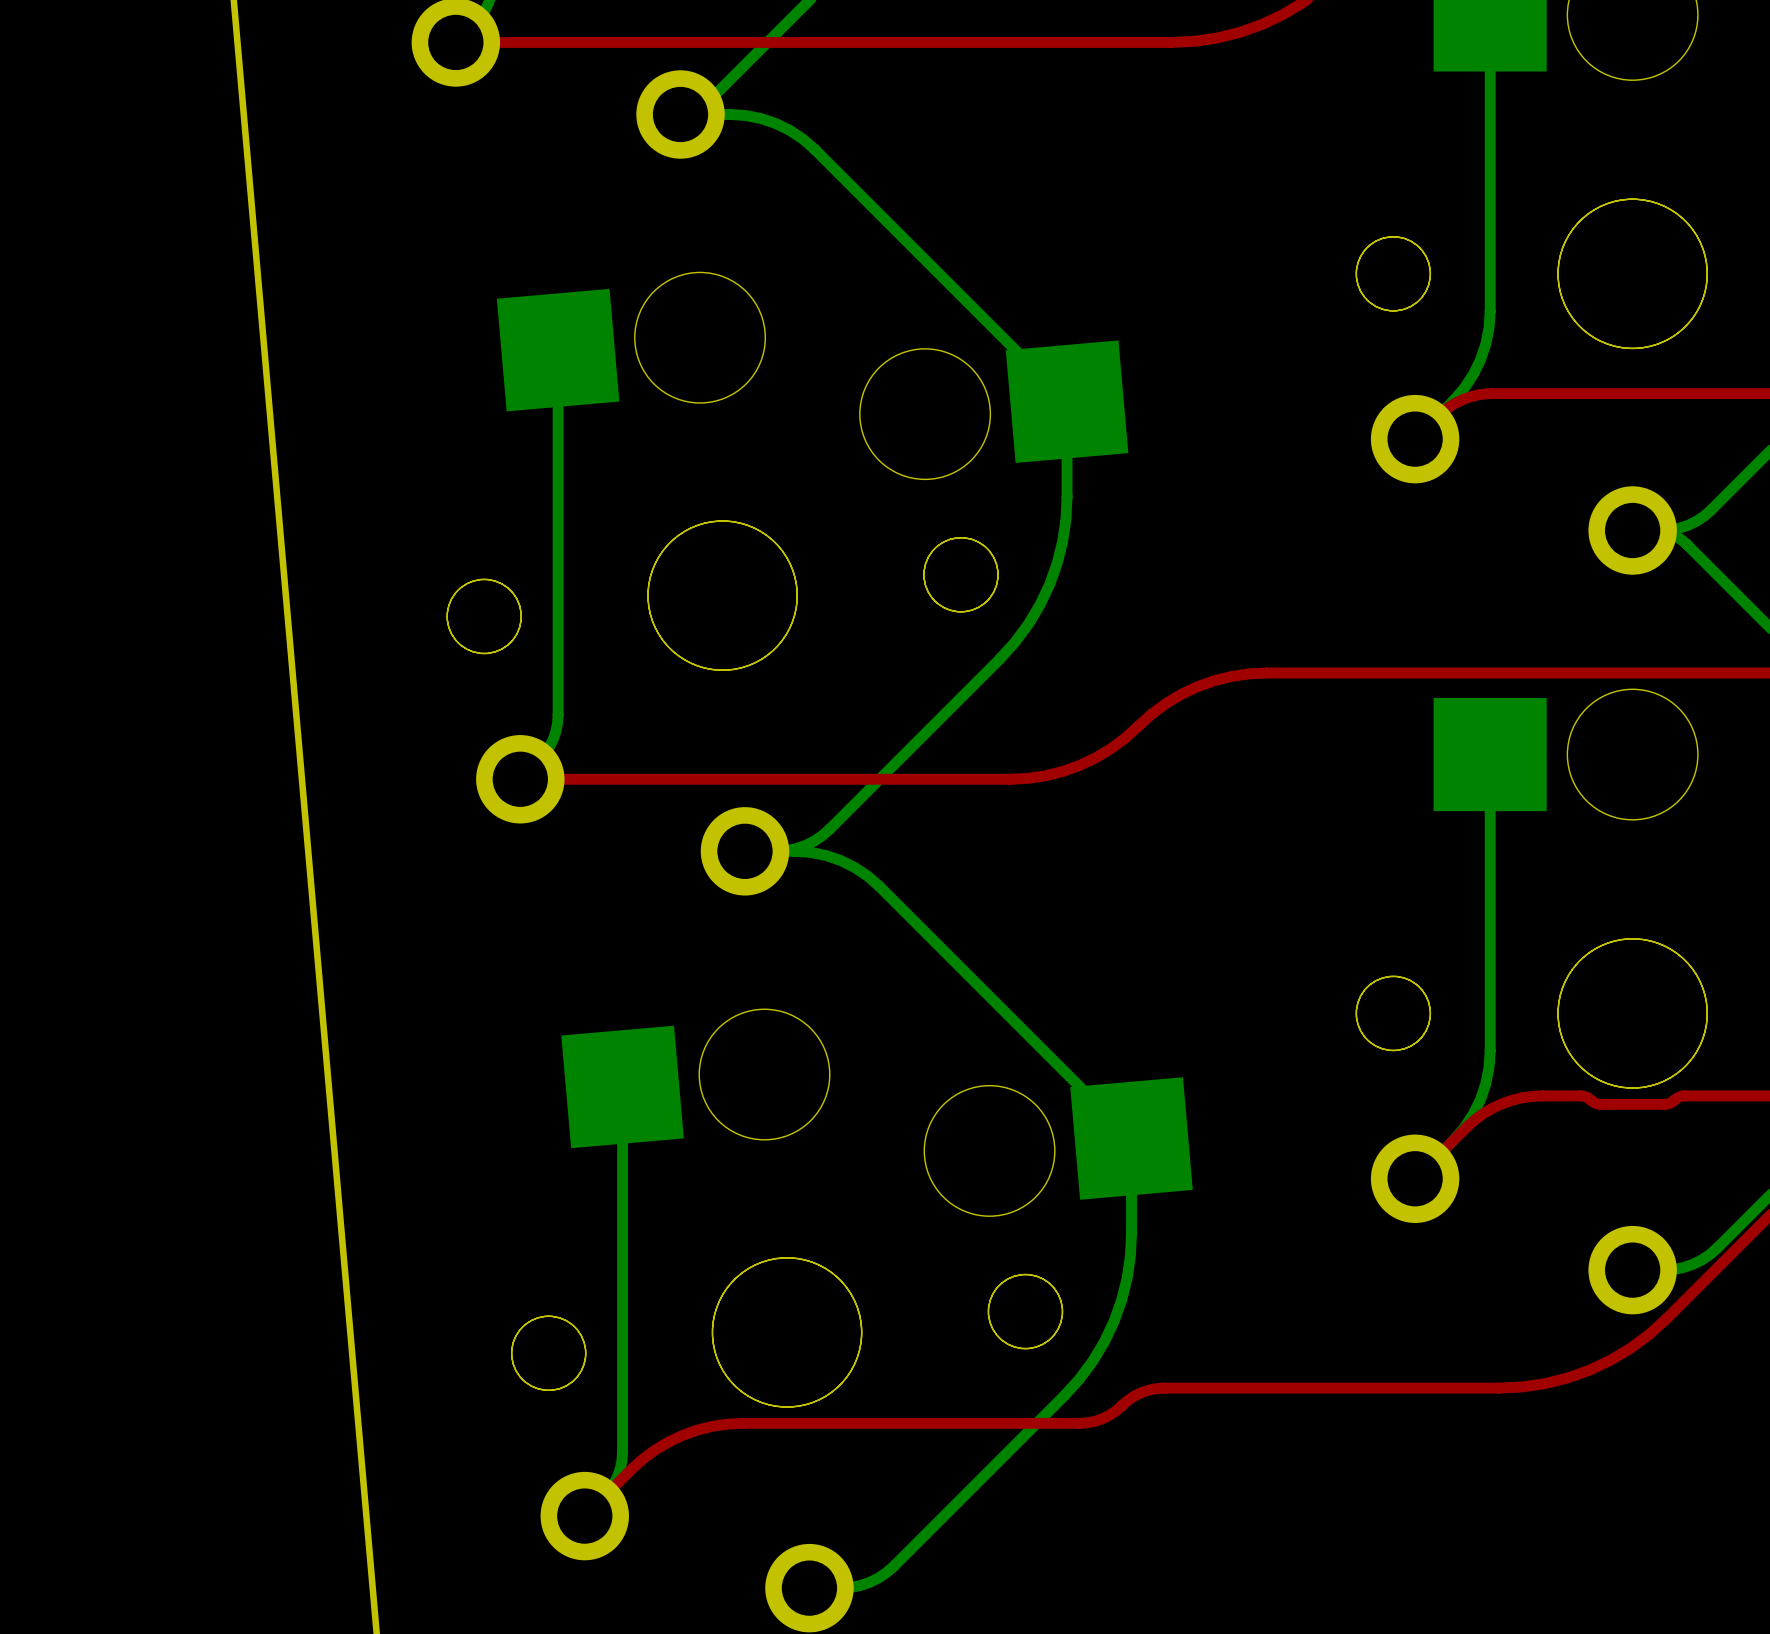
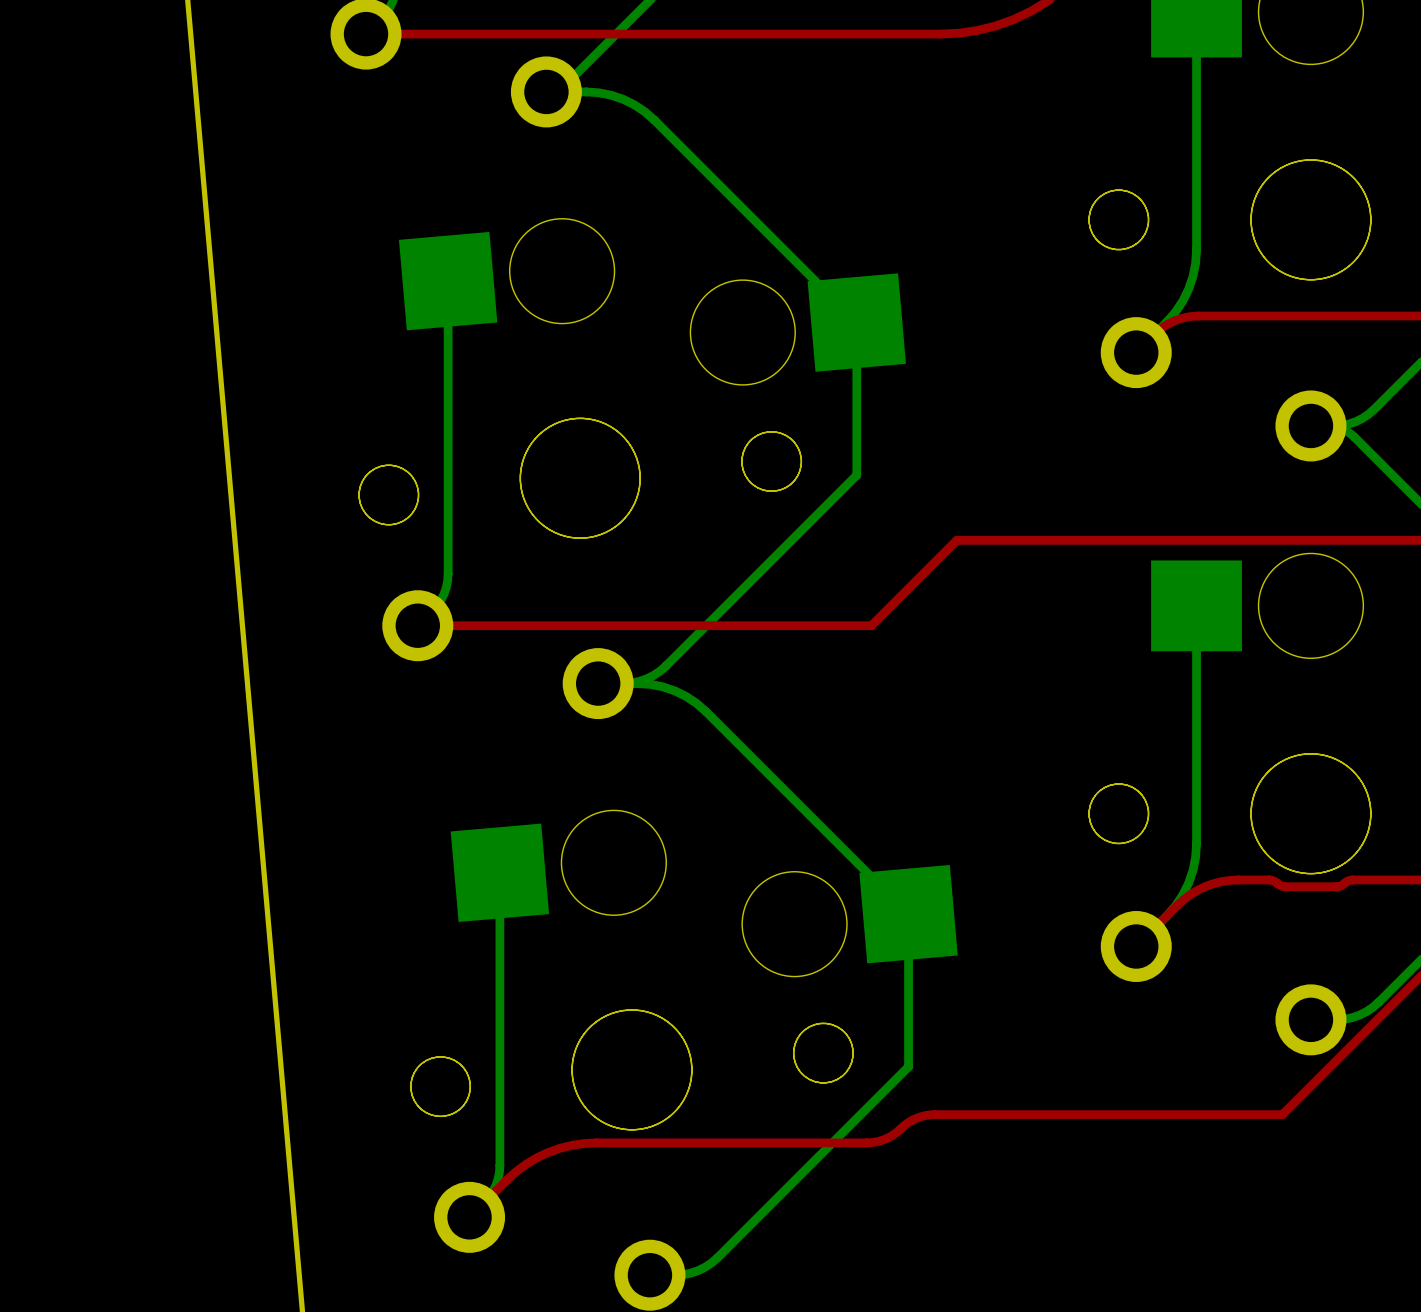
bottom track: (1067, 496) (1062, 541) (1049, 584) (1028, 624) (999, 658) -> (856, 398) (856, 475) (802, 529)
top track: (1266, 672) (1231, 676) (1197, 686) (1165, 703) (1125, 738) (1095, 757) (1062, 771) (1045, 775) (1010, 779) -> (1017, 540) (956, 540) (871, 625) (811, 625)
bottom track: (1131, 1233) (1127, 1278) (1114, 1321) (1092, 1361) (1064, 1395) -> (908, 990) (908, 1066) (854, 1120)
top track: (1666, 1318) (1630, 1348) (1589, 1370) (1545, 1383) (1499, 1388) -> (1338, 1058) (1282, 1114) (1203, 1114)

